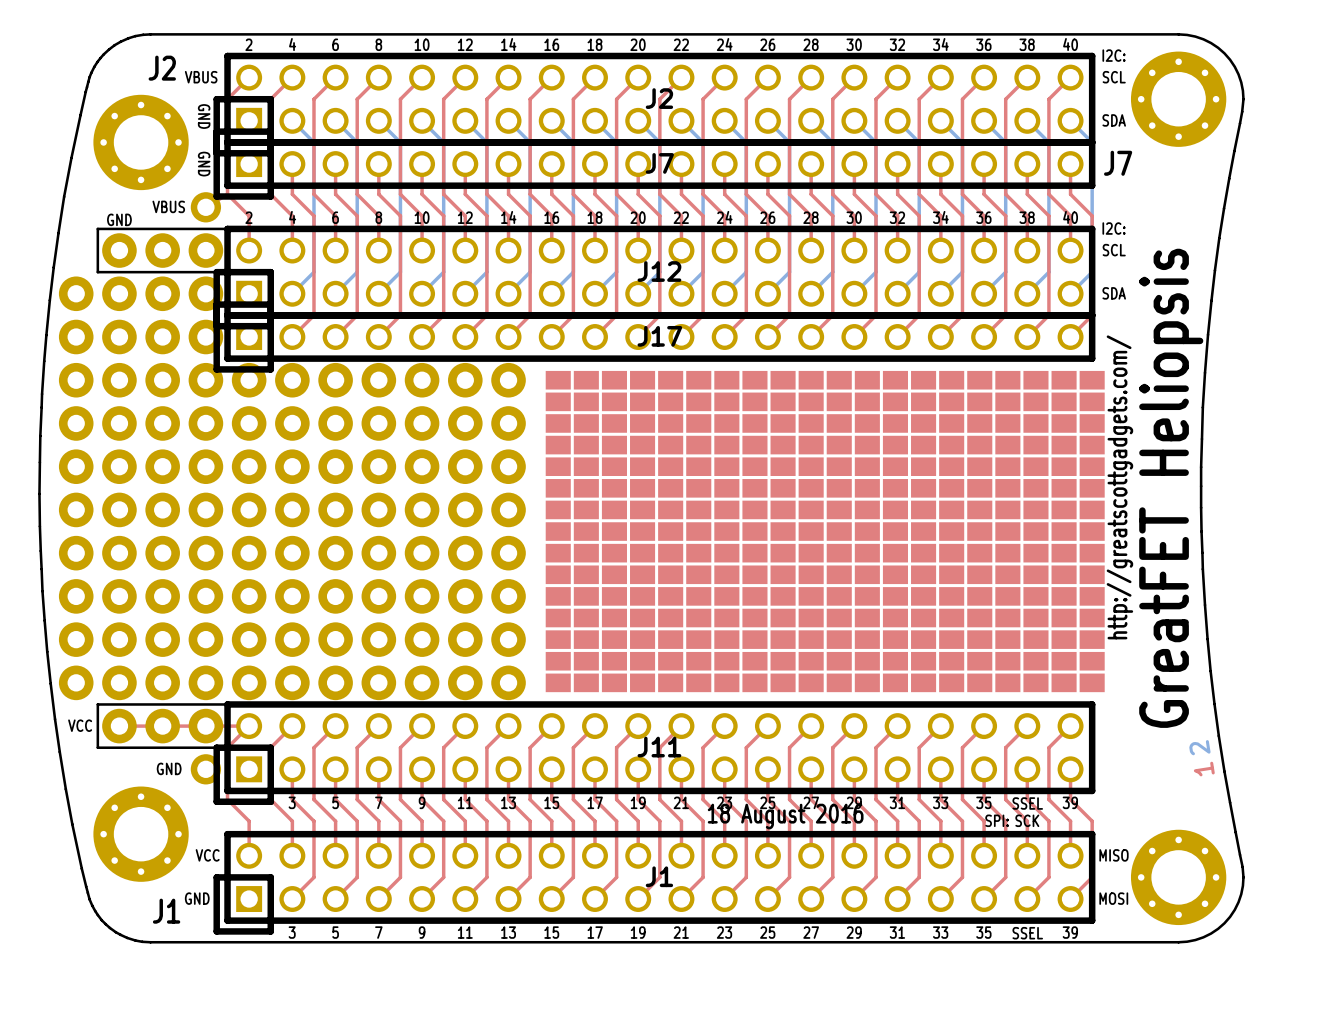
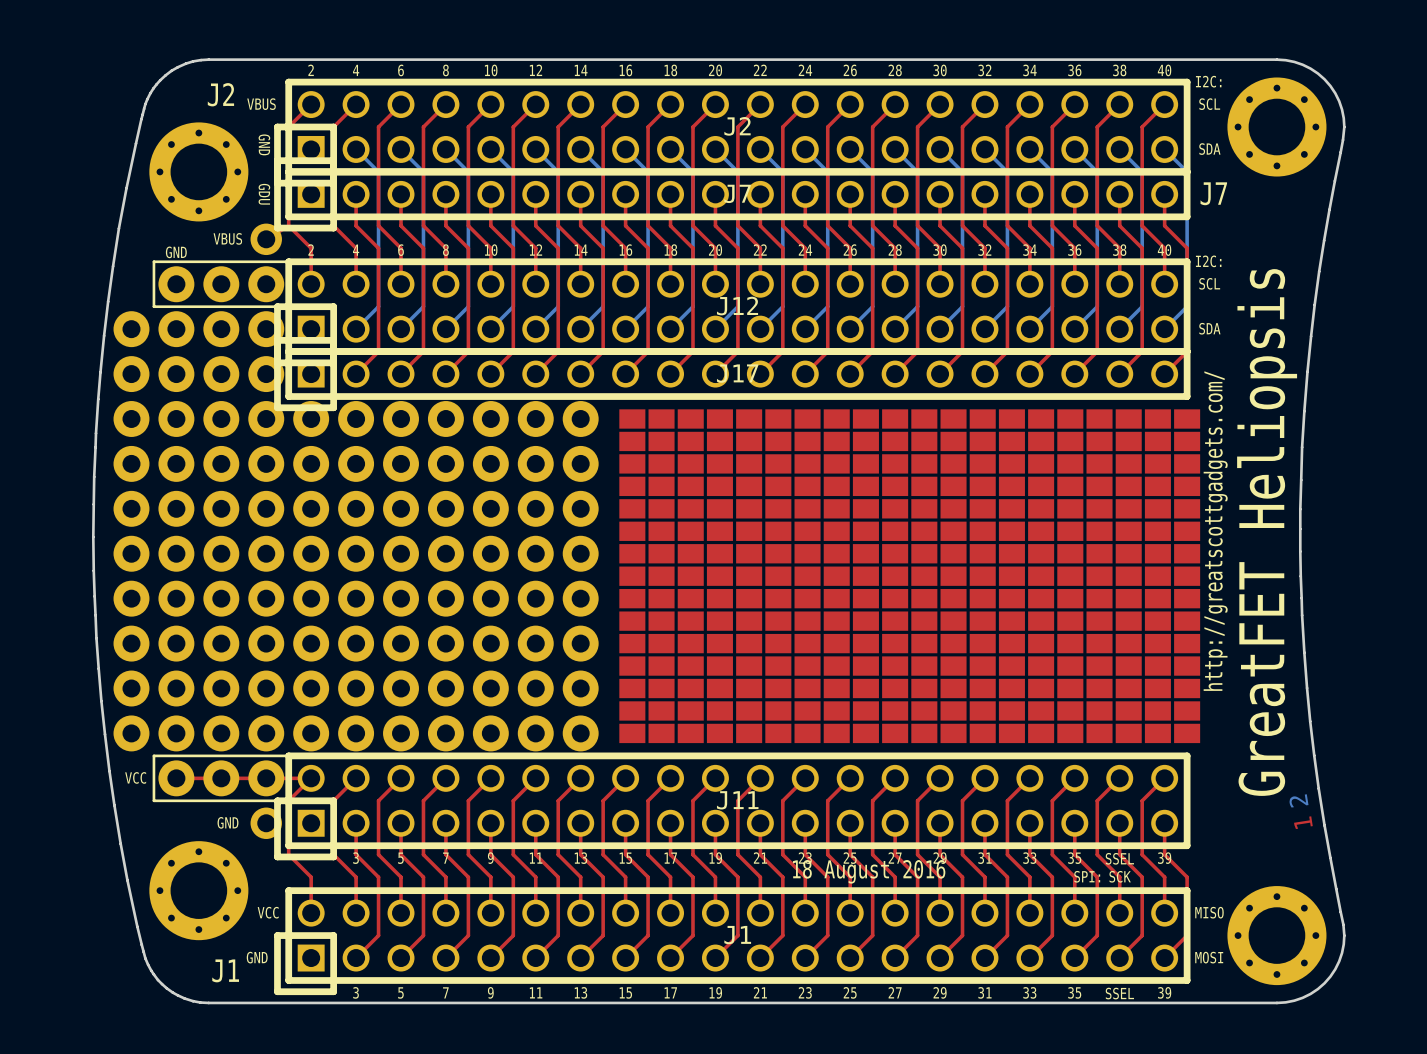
text: GND (204, 164) -> GDU (264, 194)

